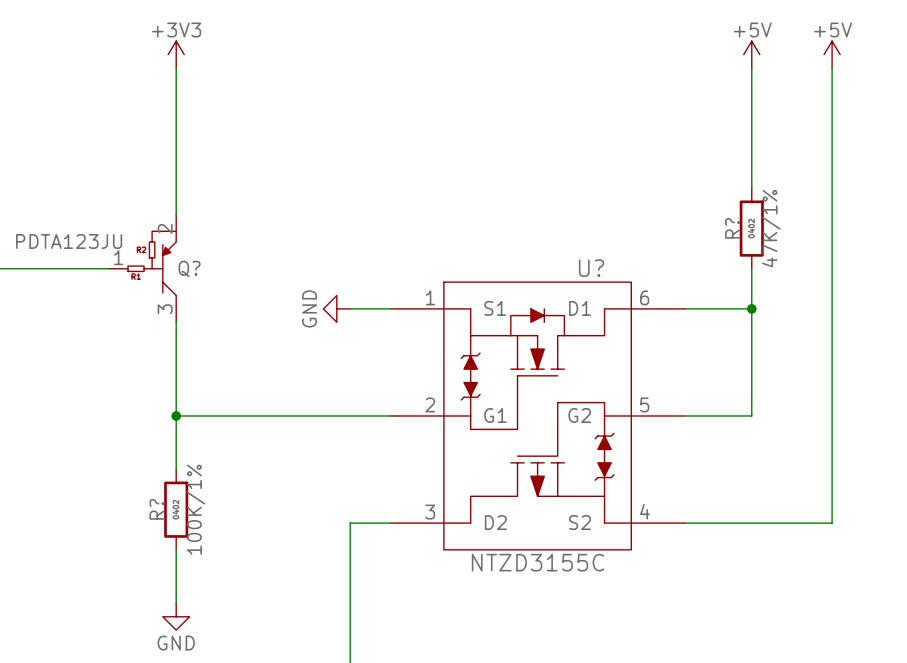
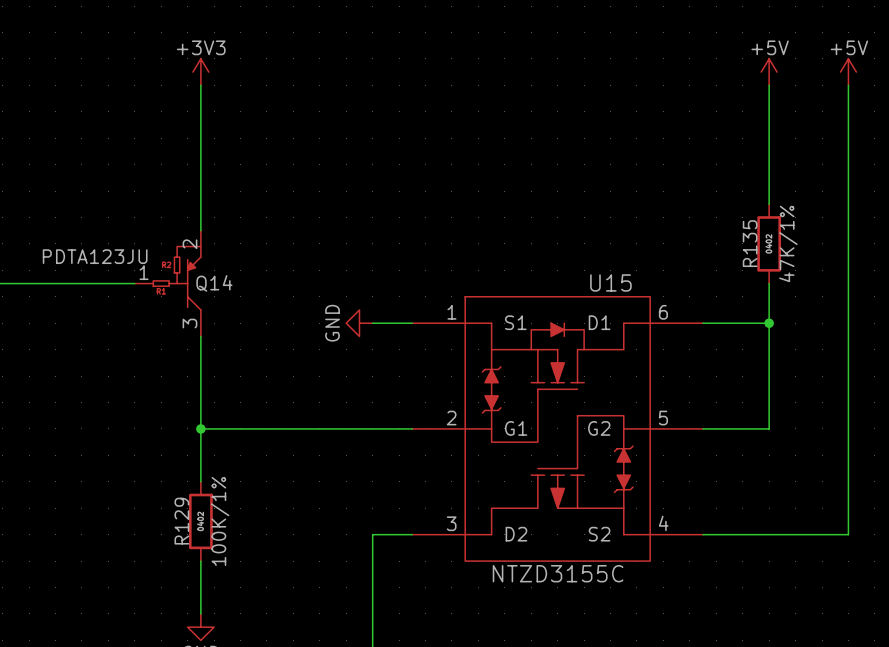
R? name: R? (732, 228) -> R135 (750, 243)
Q? name: Q? (189, 268) -> Q14 (214, 283)
U? name: U? (591, 268) -> U15 (610, 282)
R? name: R? (156, 509) -> R129 (181, 521)

